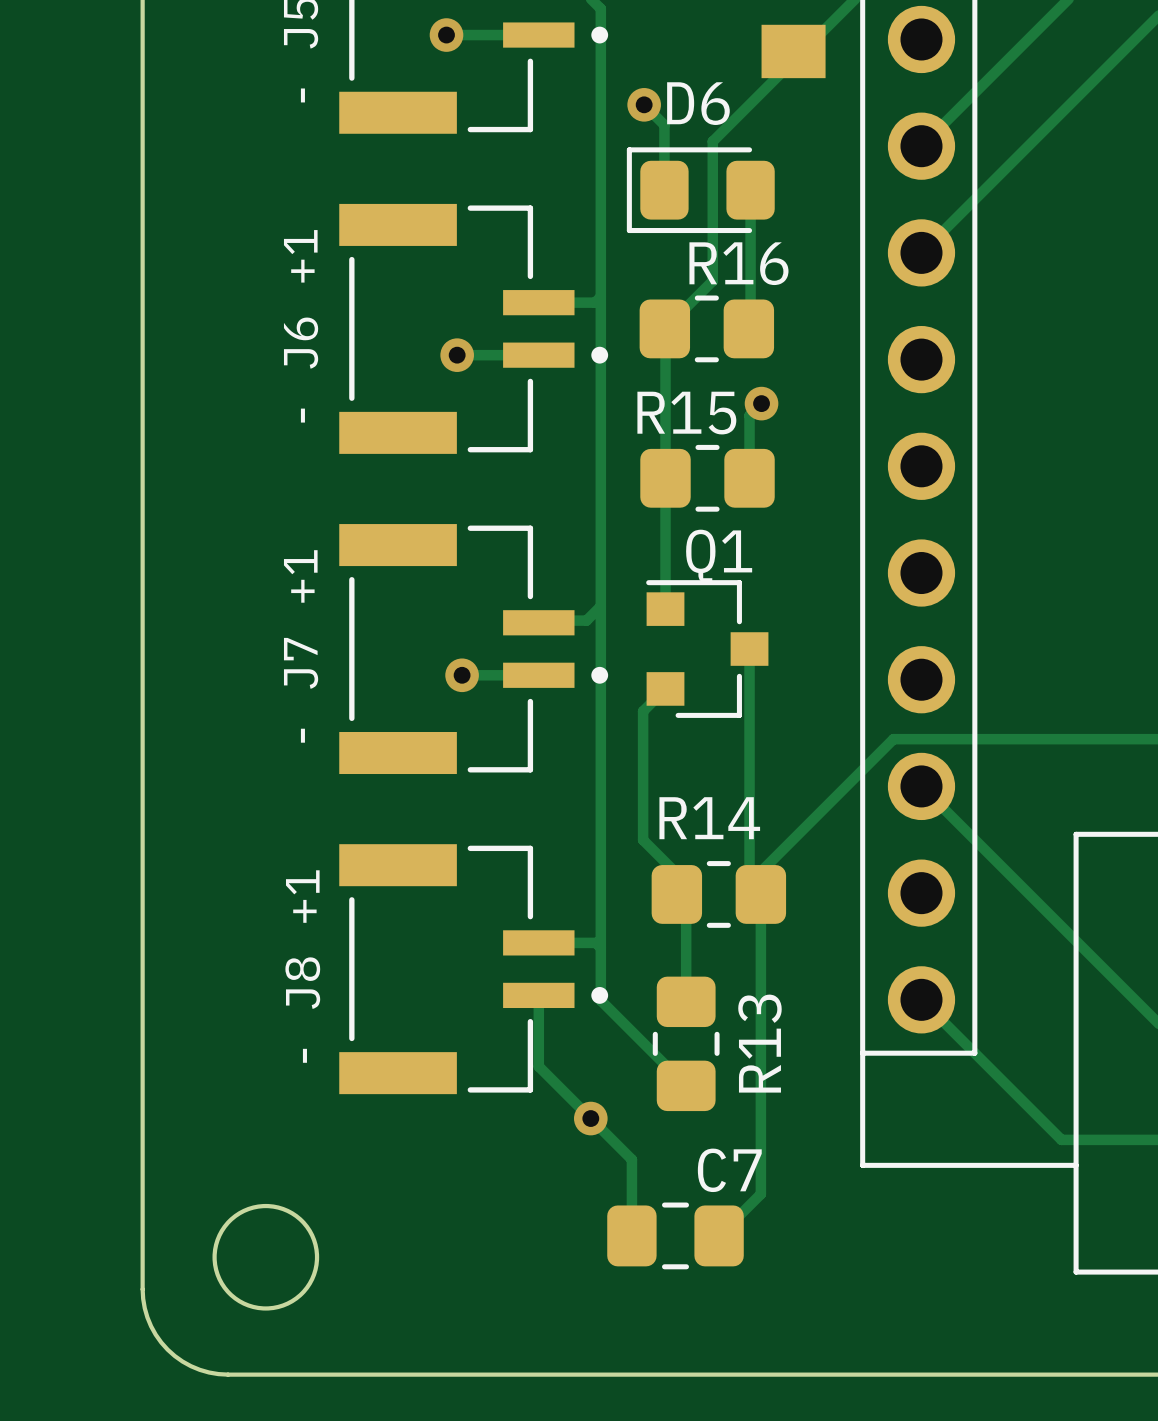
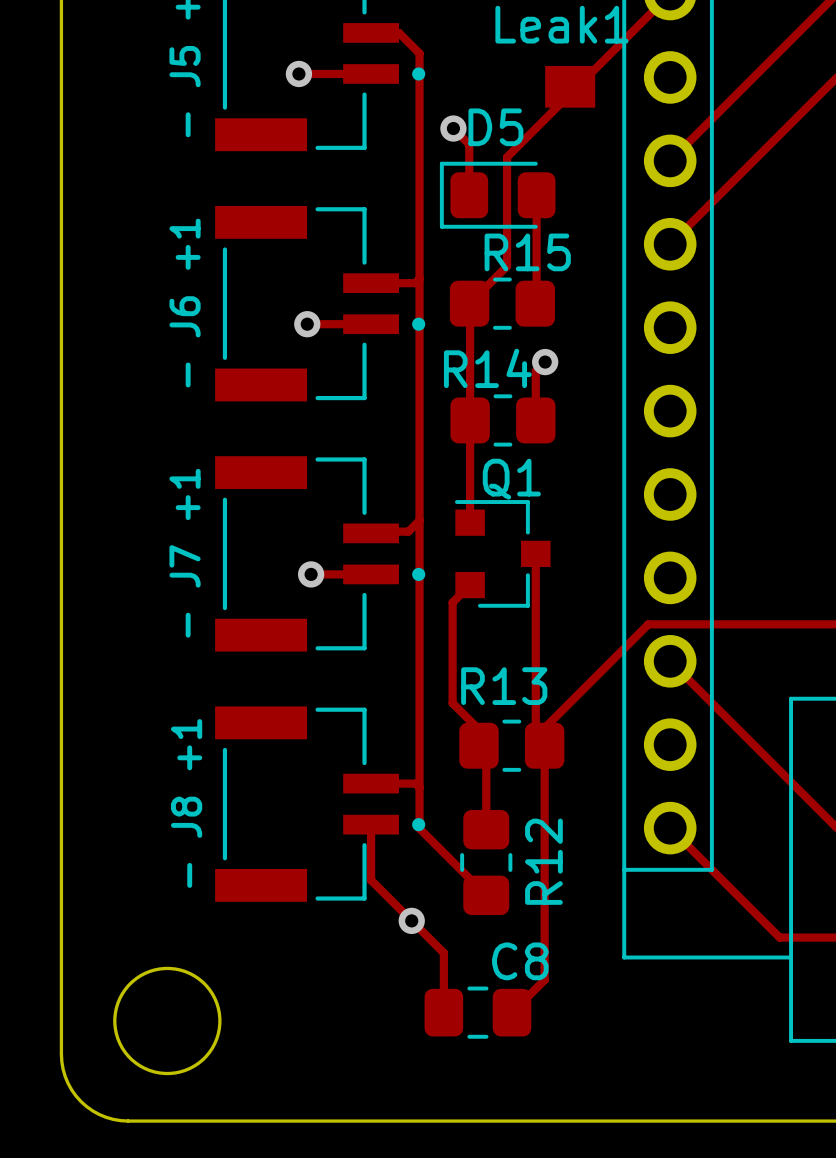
D6 name: D6 (698, 103) -> D5 (495, 127)
R16 name: R16 (738, 263) -> R15 (527, 252)
R15 name: R15 (686, 413) -> R14 (487, 368)
R14 name: R14 (709, 818) -> R13 (504, 686)
R13 name: R13 (759, 1043) -> R12 (543, 861)
C7 name: C7 (729, 1170) -> C8 (520, 961)
round board edge size: [212, 1203, 320, 1311] -> [113, 966, 222, 1076]

